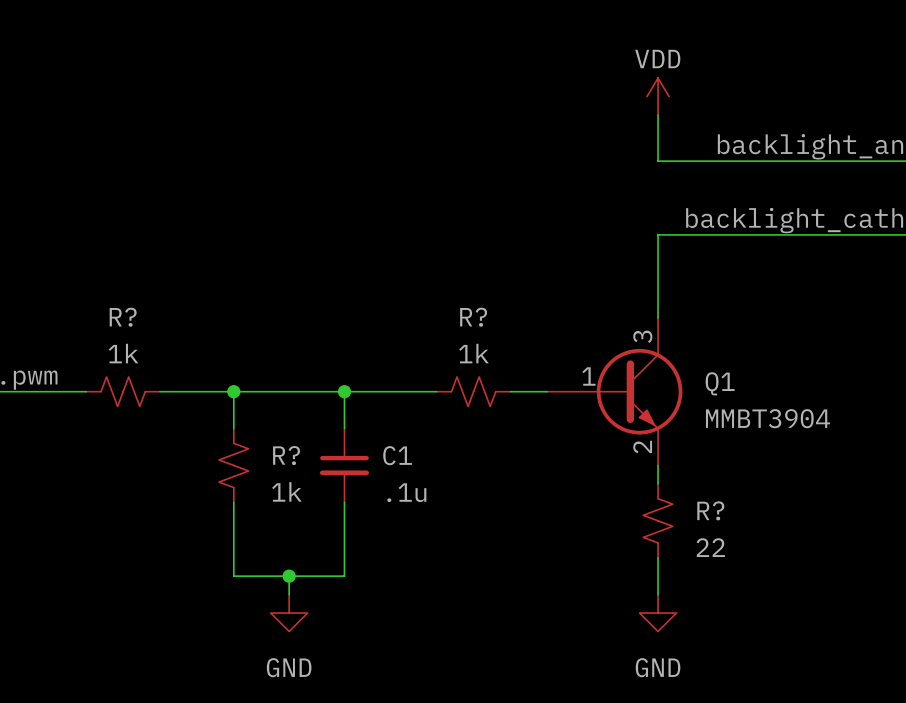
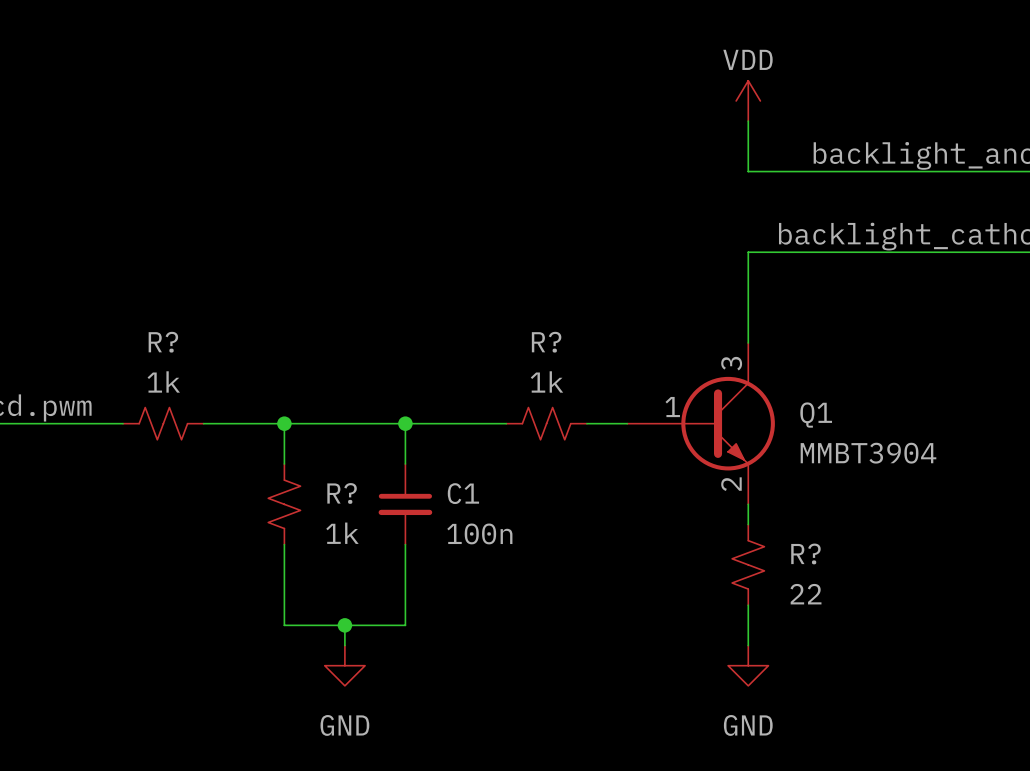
C1 value: .1u (406, 492) -> 100n (479, 533)

